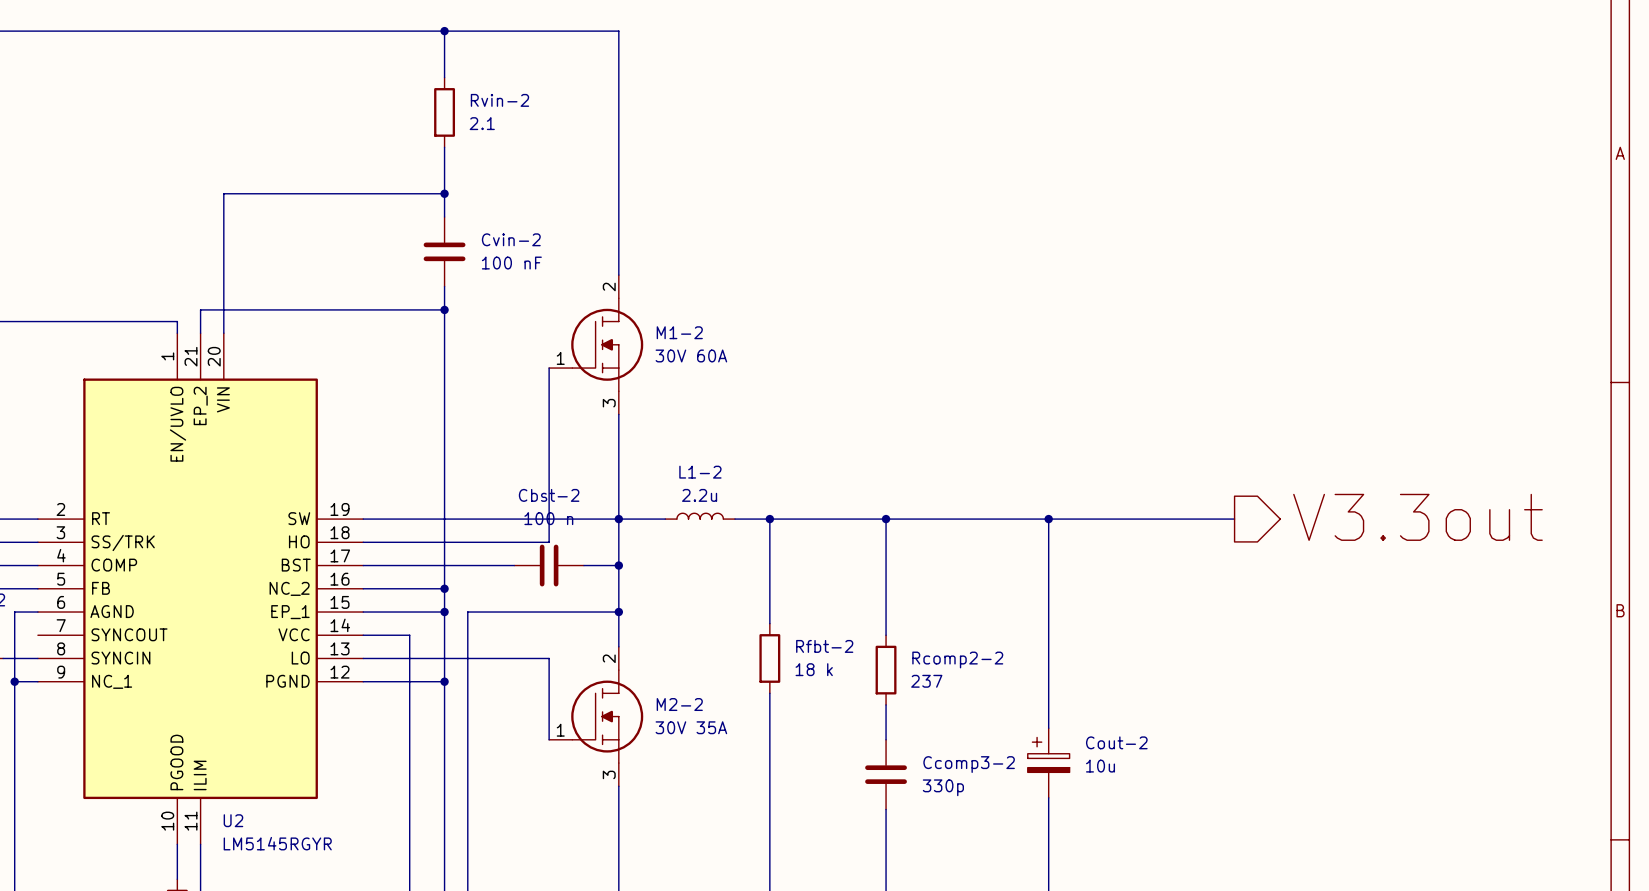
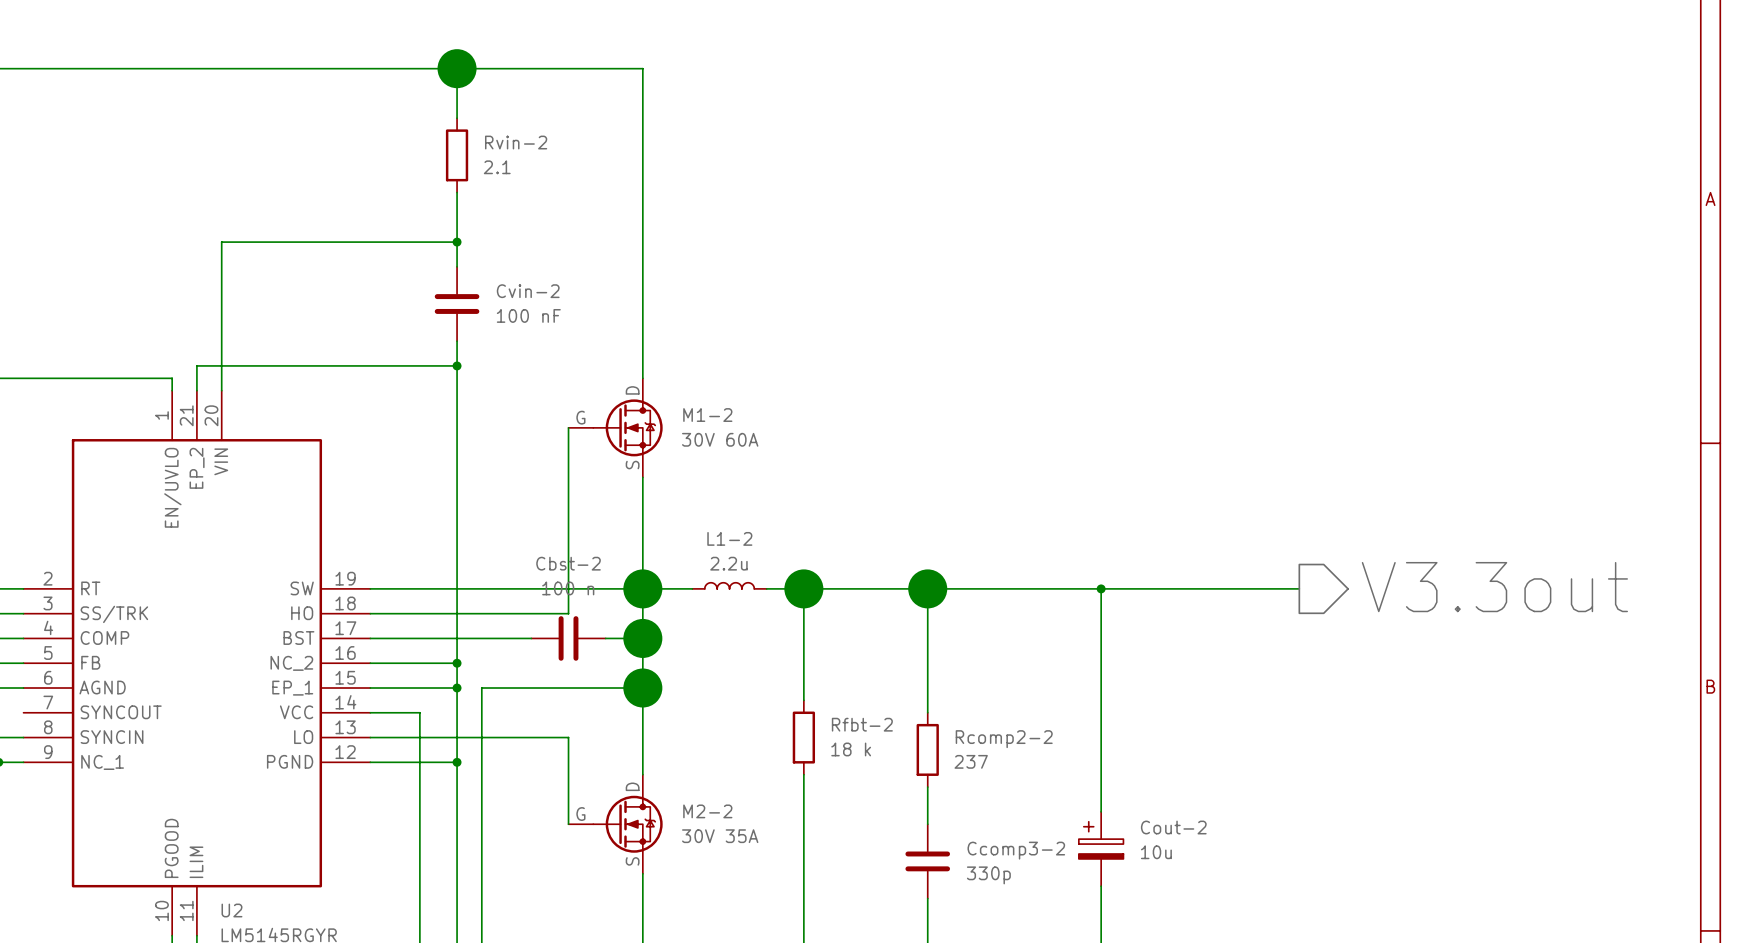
junction size: [440, 26, 449, 36] -> [437, 49, 477, 89]
M1-2 symbol: [549, 275, 644, 415] -> [568, 378, 663, 478]
junction size: [614, 514, 624, 524] -> [623, 569, 663, 609]
junction size: [765, 514, 775, 524] -> [784, 569, 824, 609]
junction size: [881, 514, 891, 524] -> [908, 569, 948, 609]
junction size: [614, 561, 624, 570] -> [623, 618, 663, 658]
junction size: [614, 607, 624, 617] -> [623, 668, 663, 708]
M2-2 symbol: [549, 646, 644, 787] -> [568, 774, 663, 874]

